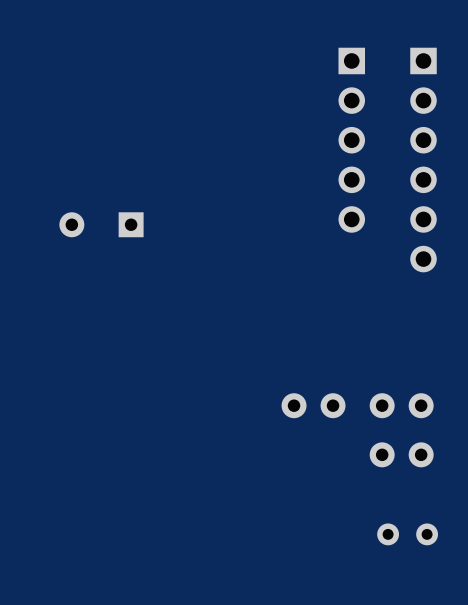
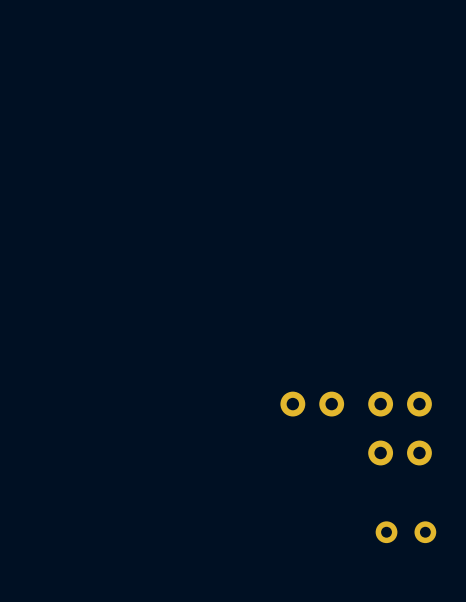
part: (351, 140) -> none
part: (423, 160) -> none
part: (101, 224) -> none

